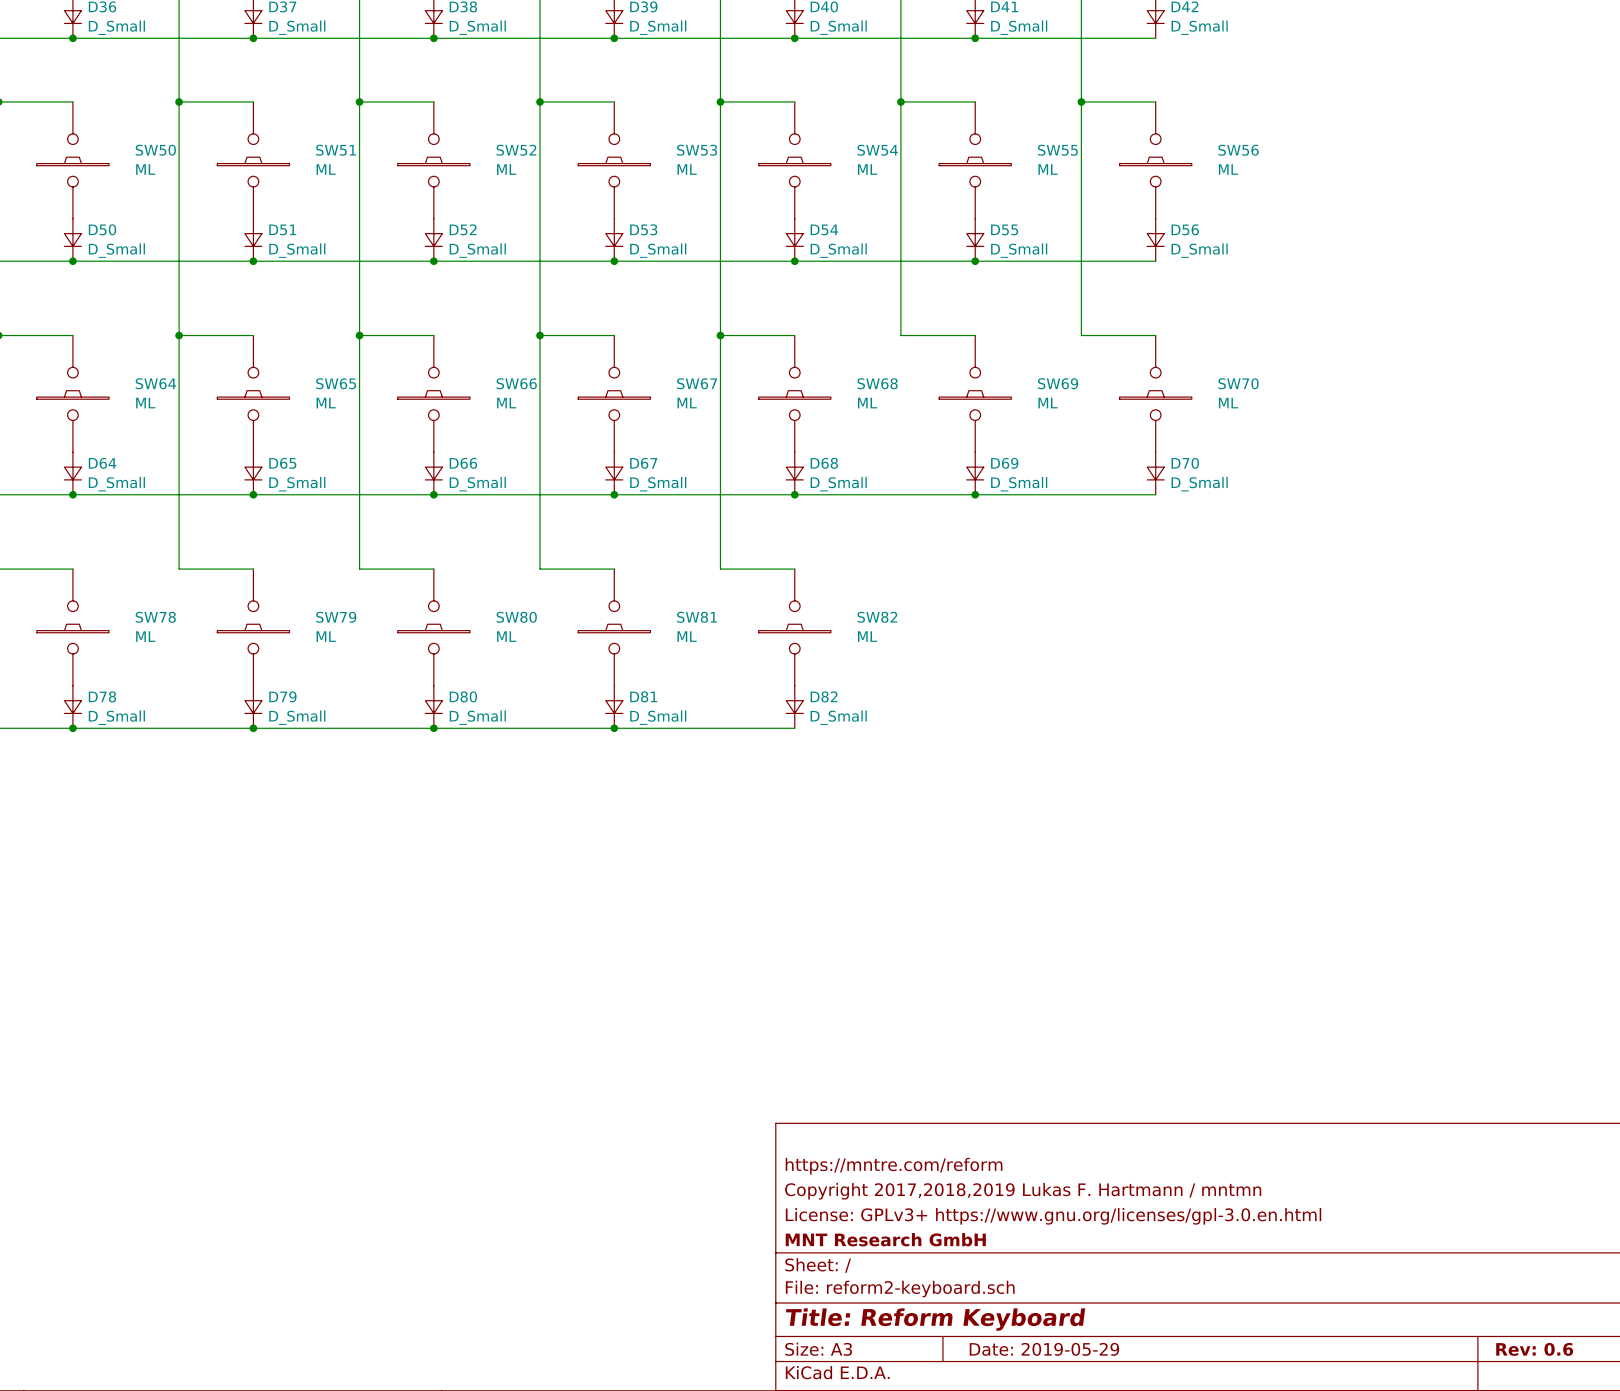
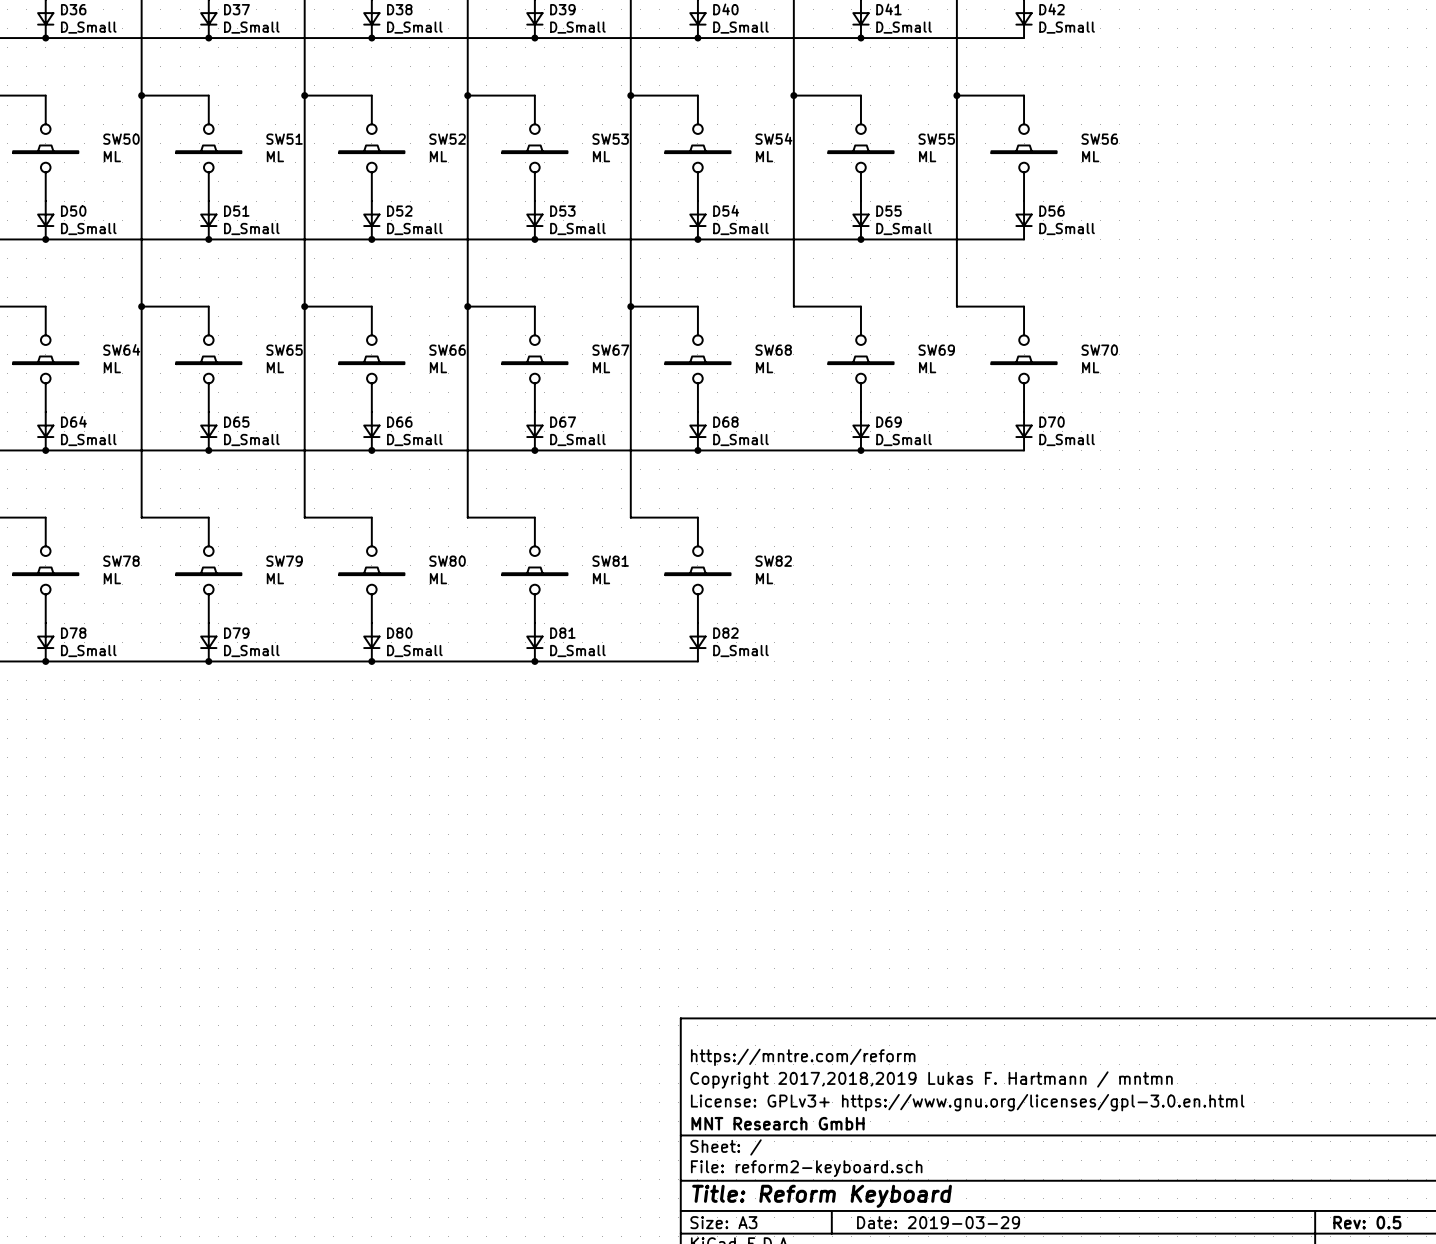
title block: Date: 2019-05-29 (1044, 1349) -> Date: 2019-03-29 (938, 1222)
title block: Rev: 0.6 (1534, 1349) -> Rev: 0.5 (1367, 1222)

